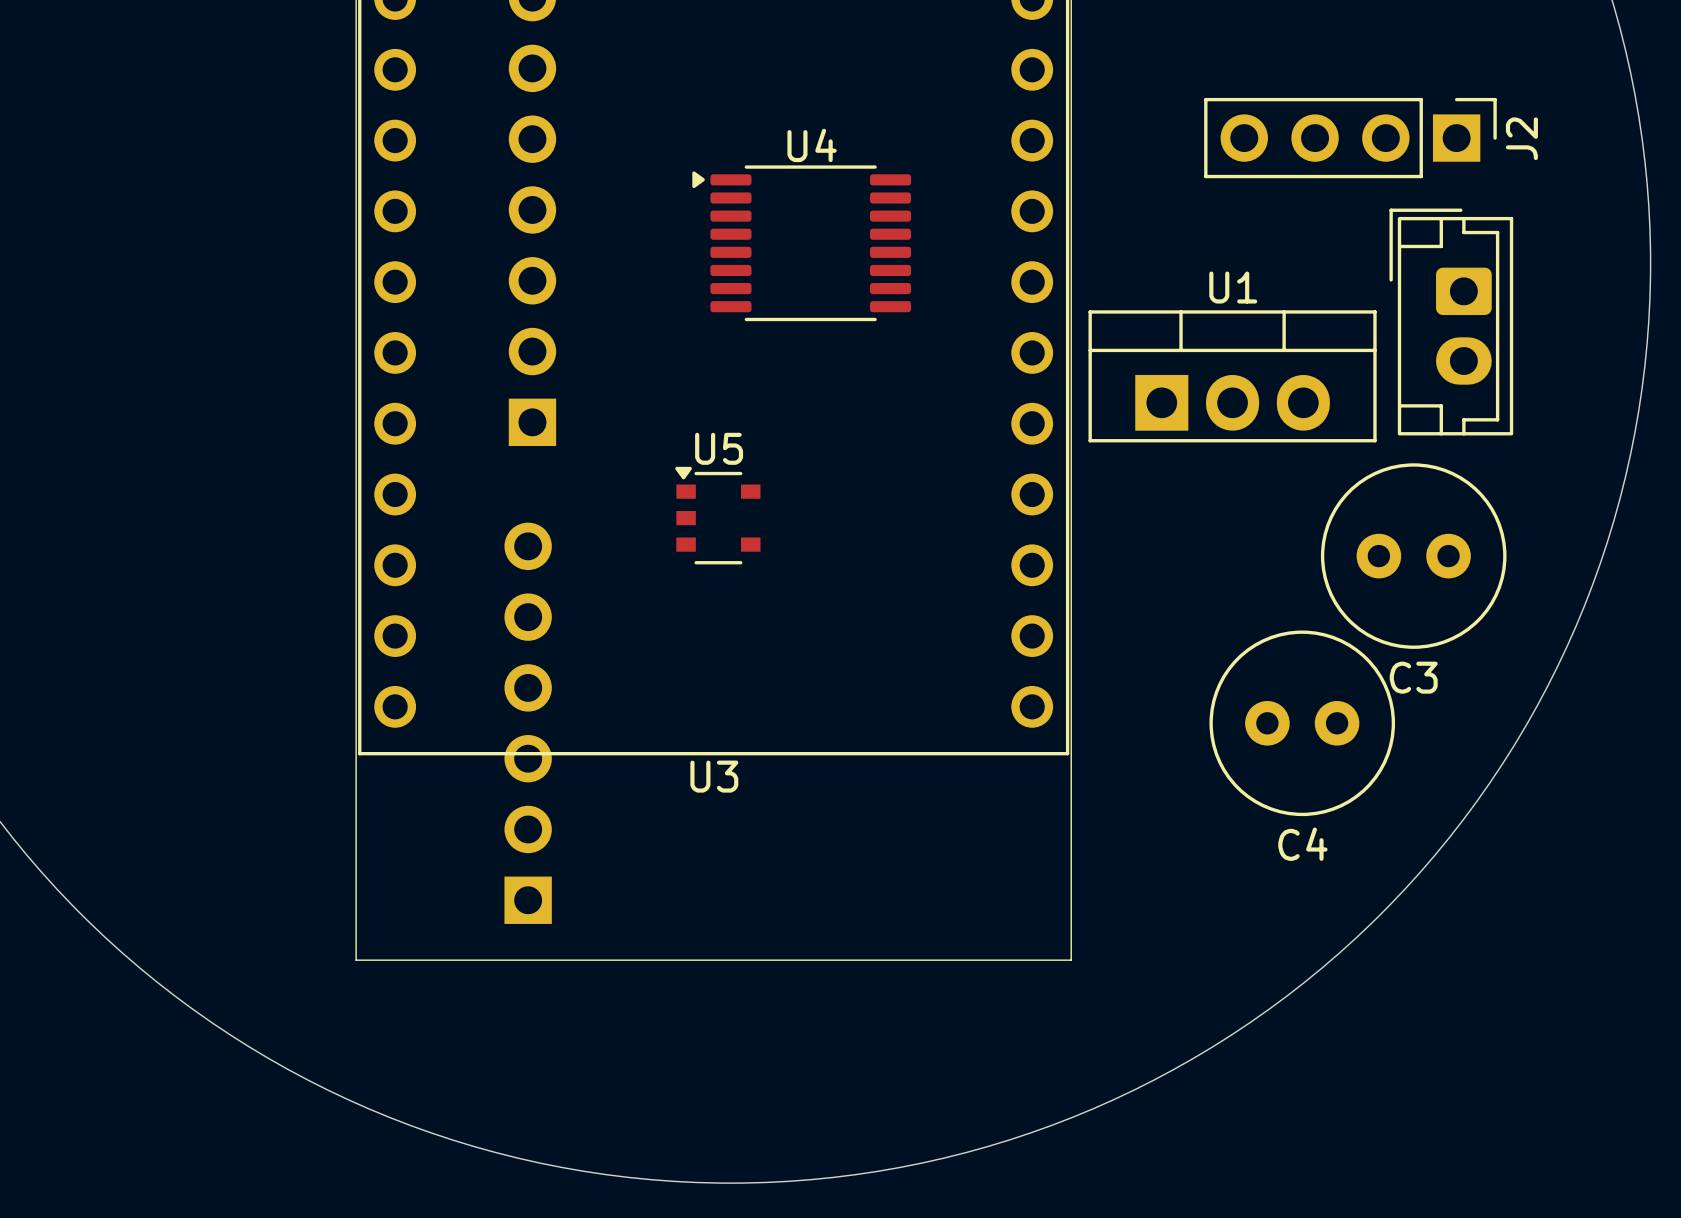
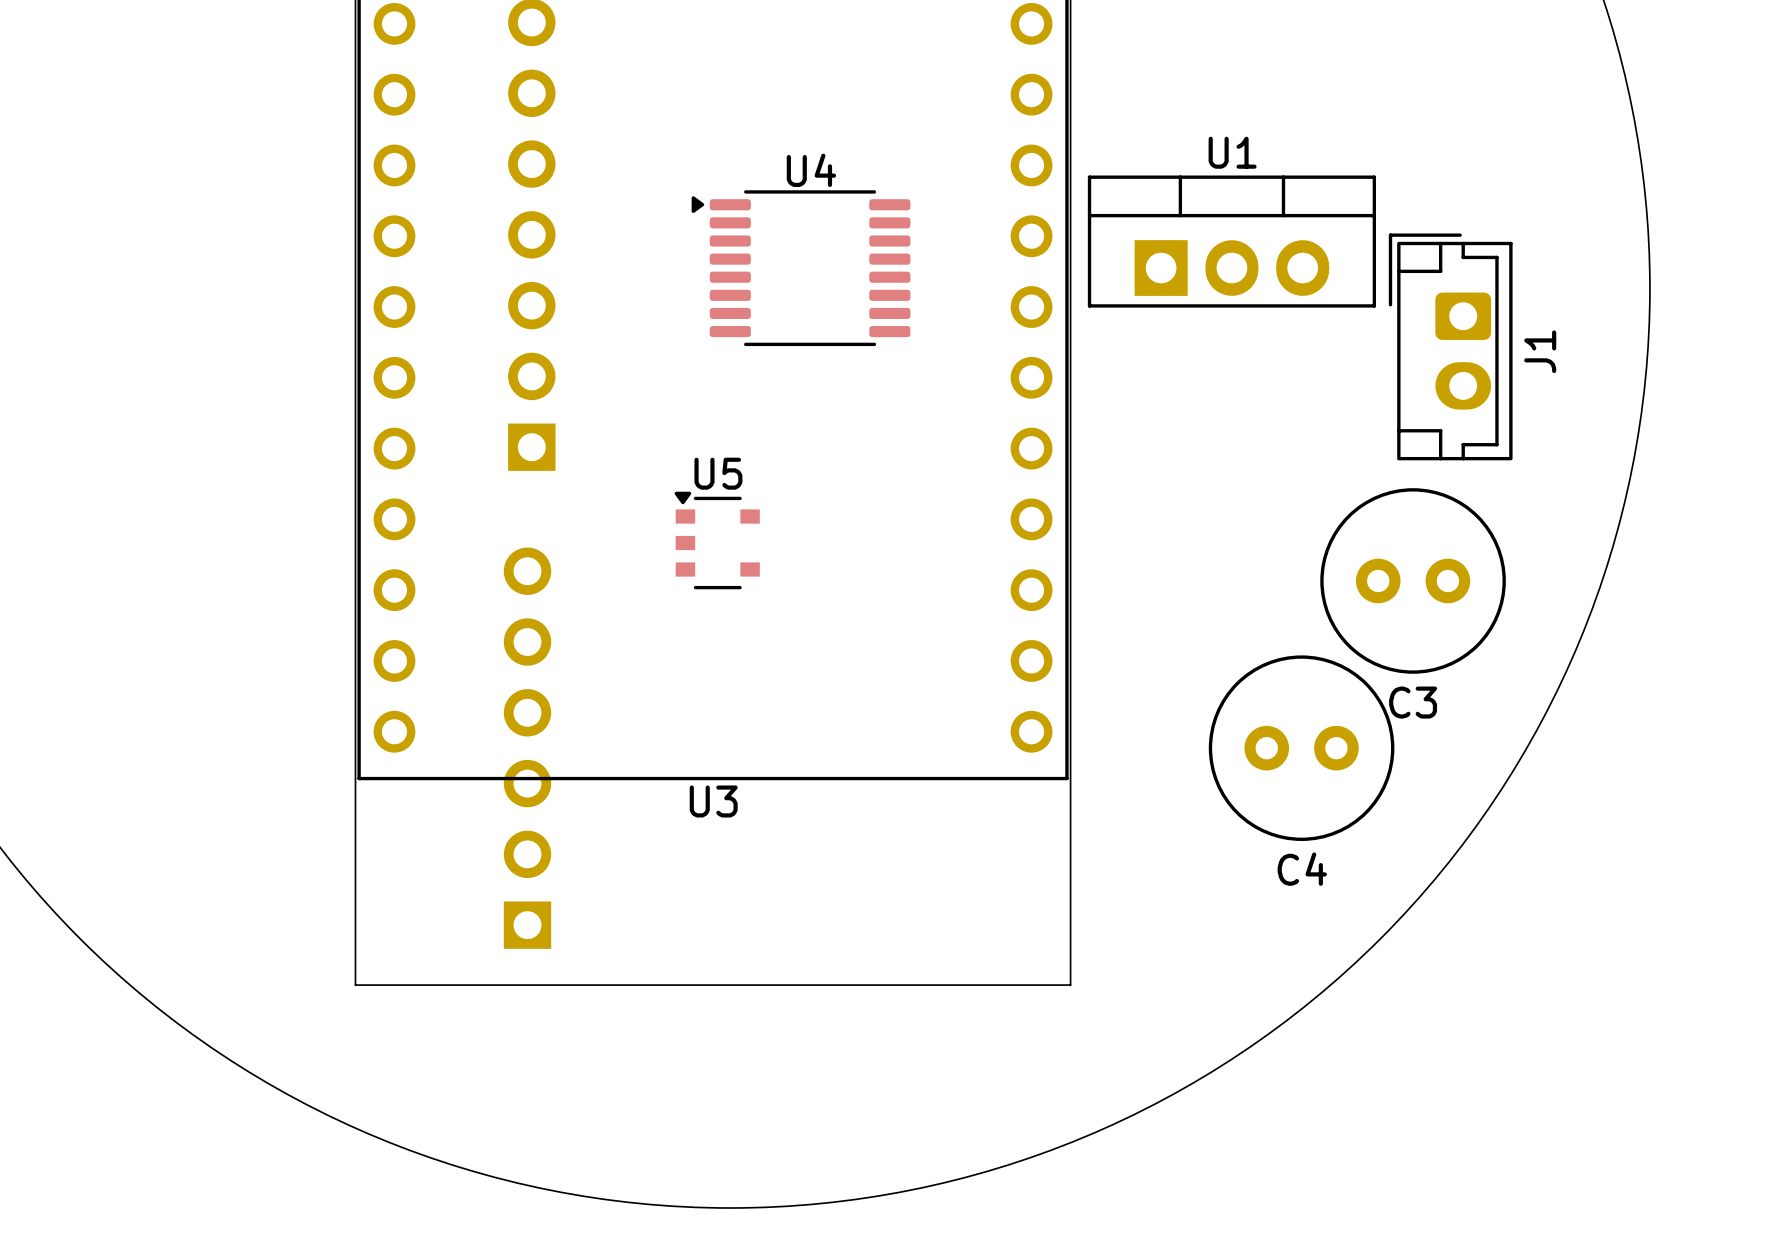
J2: (1350, 138) -> none
J1 name: none -> J1 (1540, 351)
U1 position: (1232, 376) -> (1231, 241)

